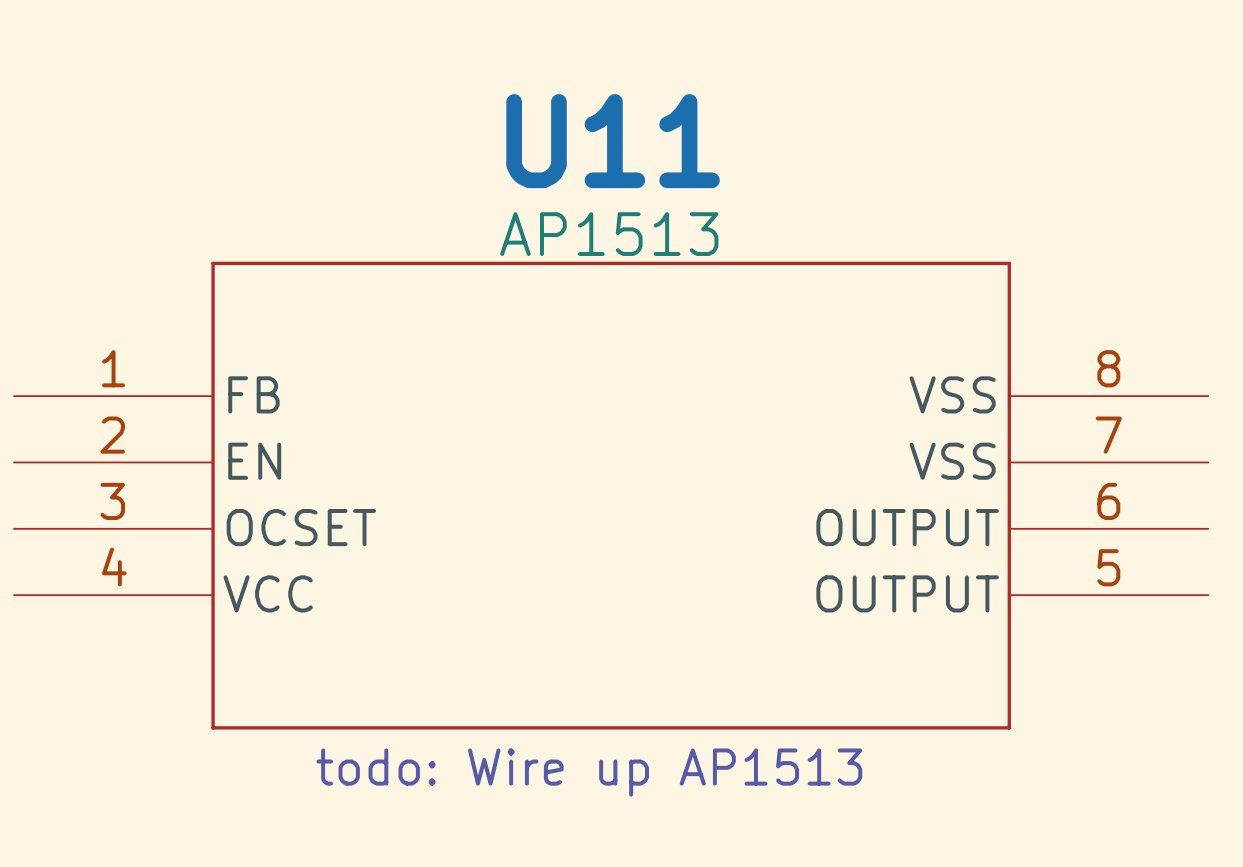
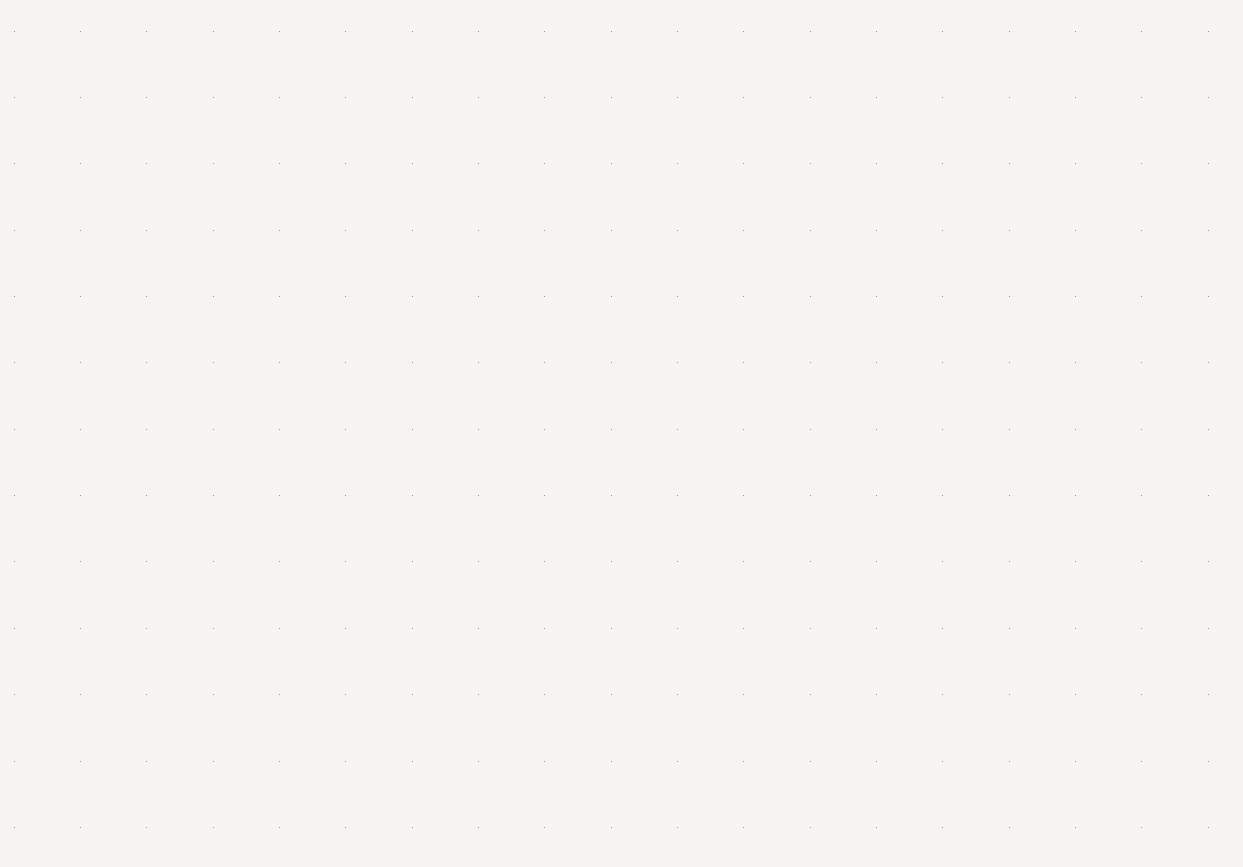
U11: AP1513 (611, 495) -> none
text: todo: Wire up AP1513 (589, 772) -> none

